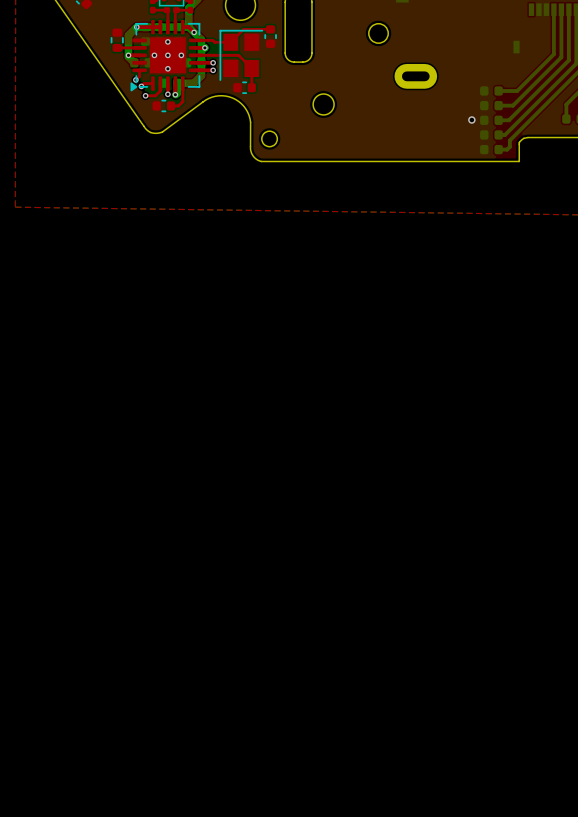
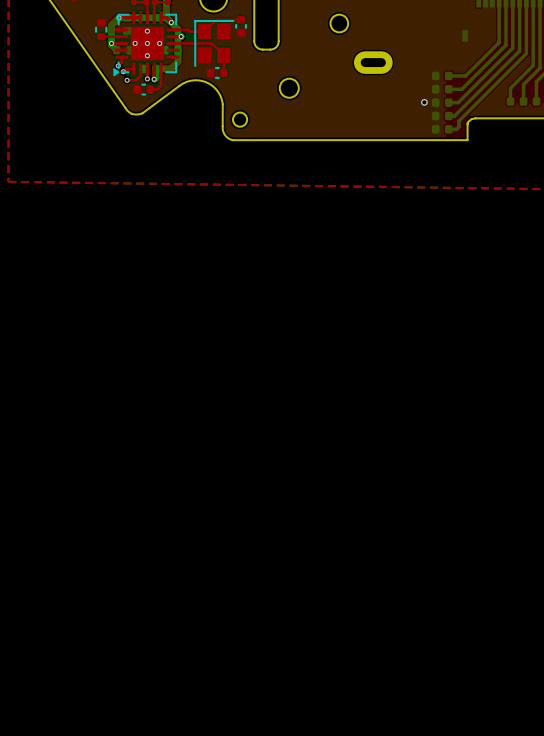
top track: (196, 62) (213, 62) -> none
via: (213, 62) -> none
top track: (196, 70) (213, 70) -> none
via: (213, 70) -> none

